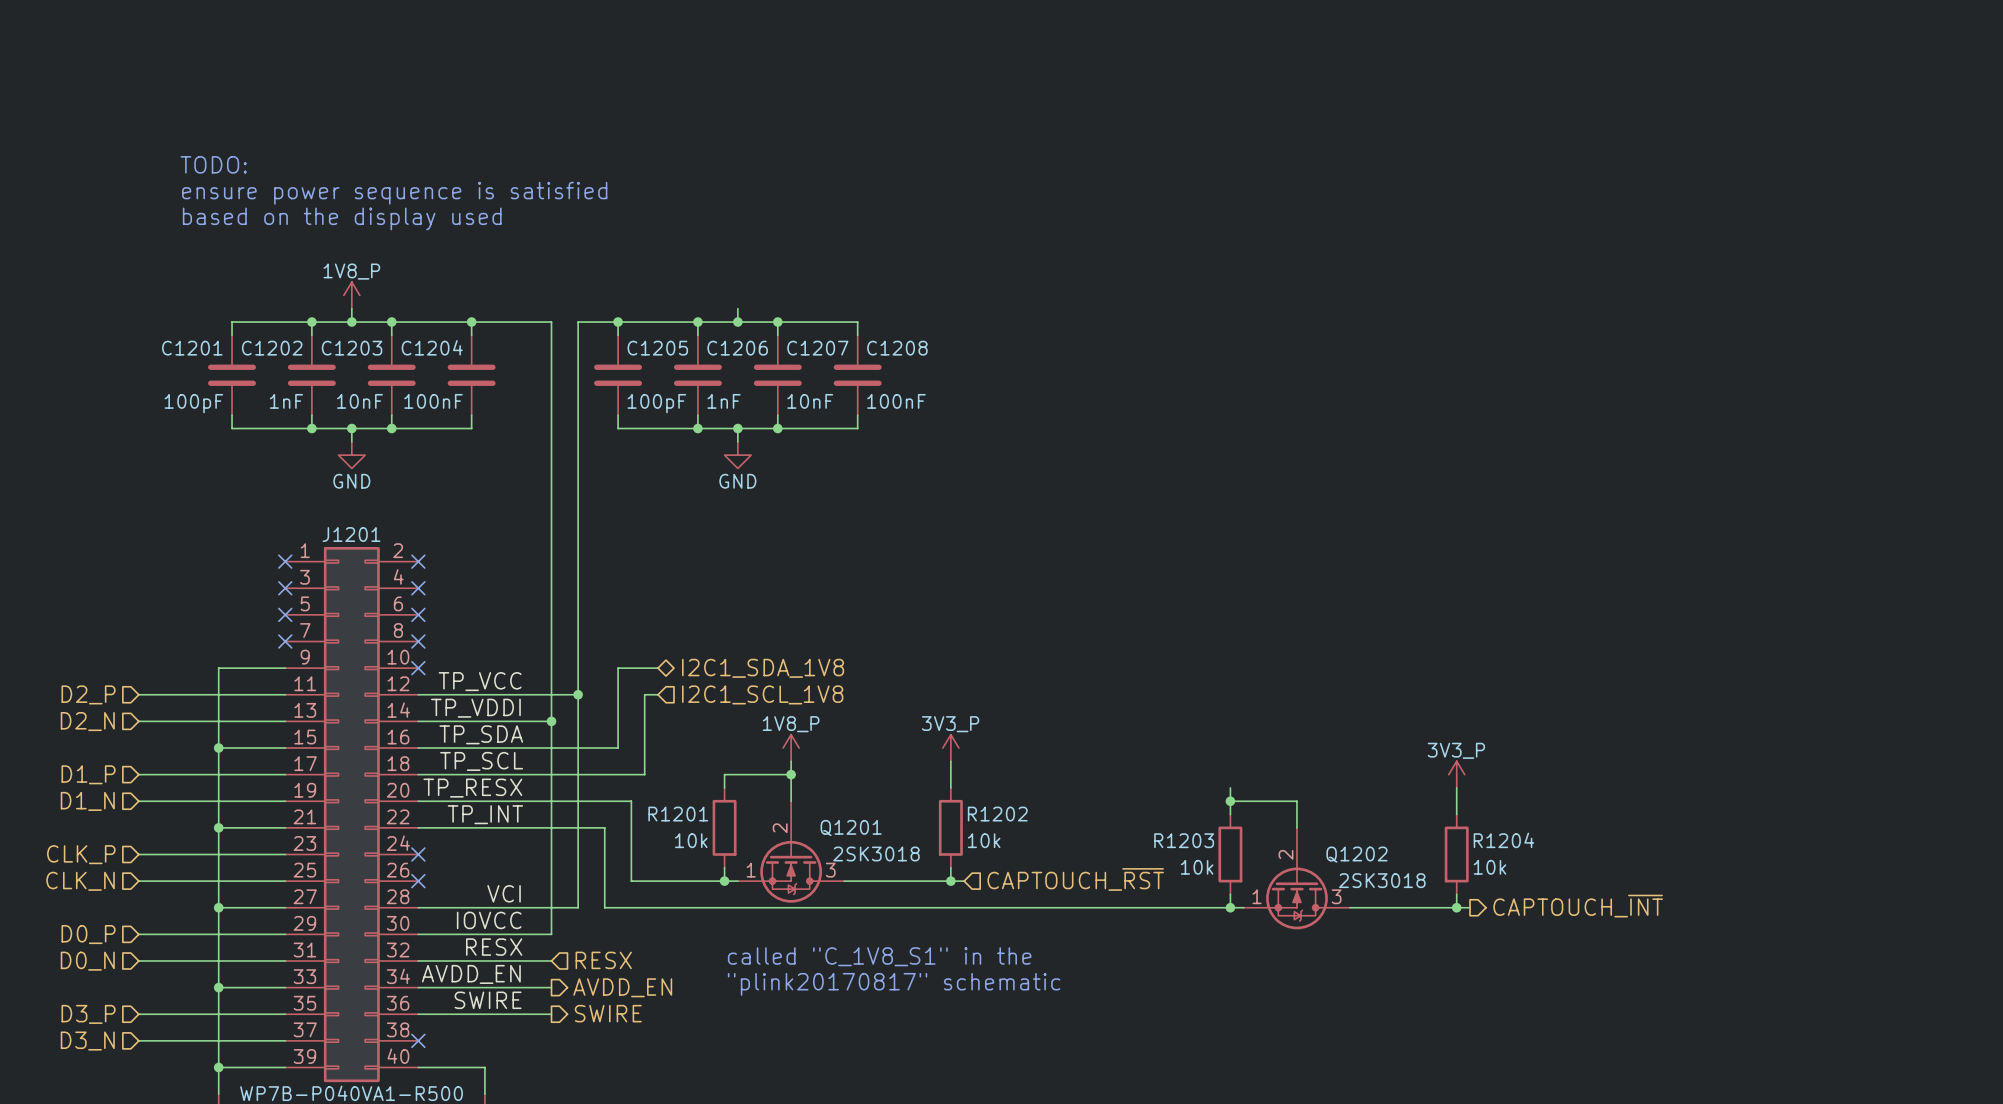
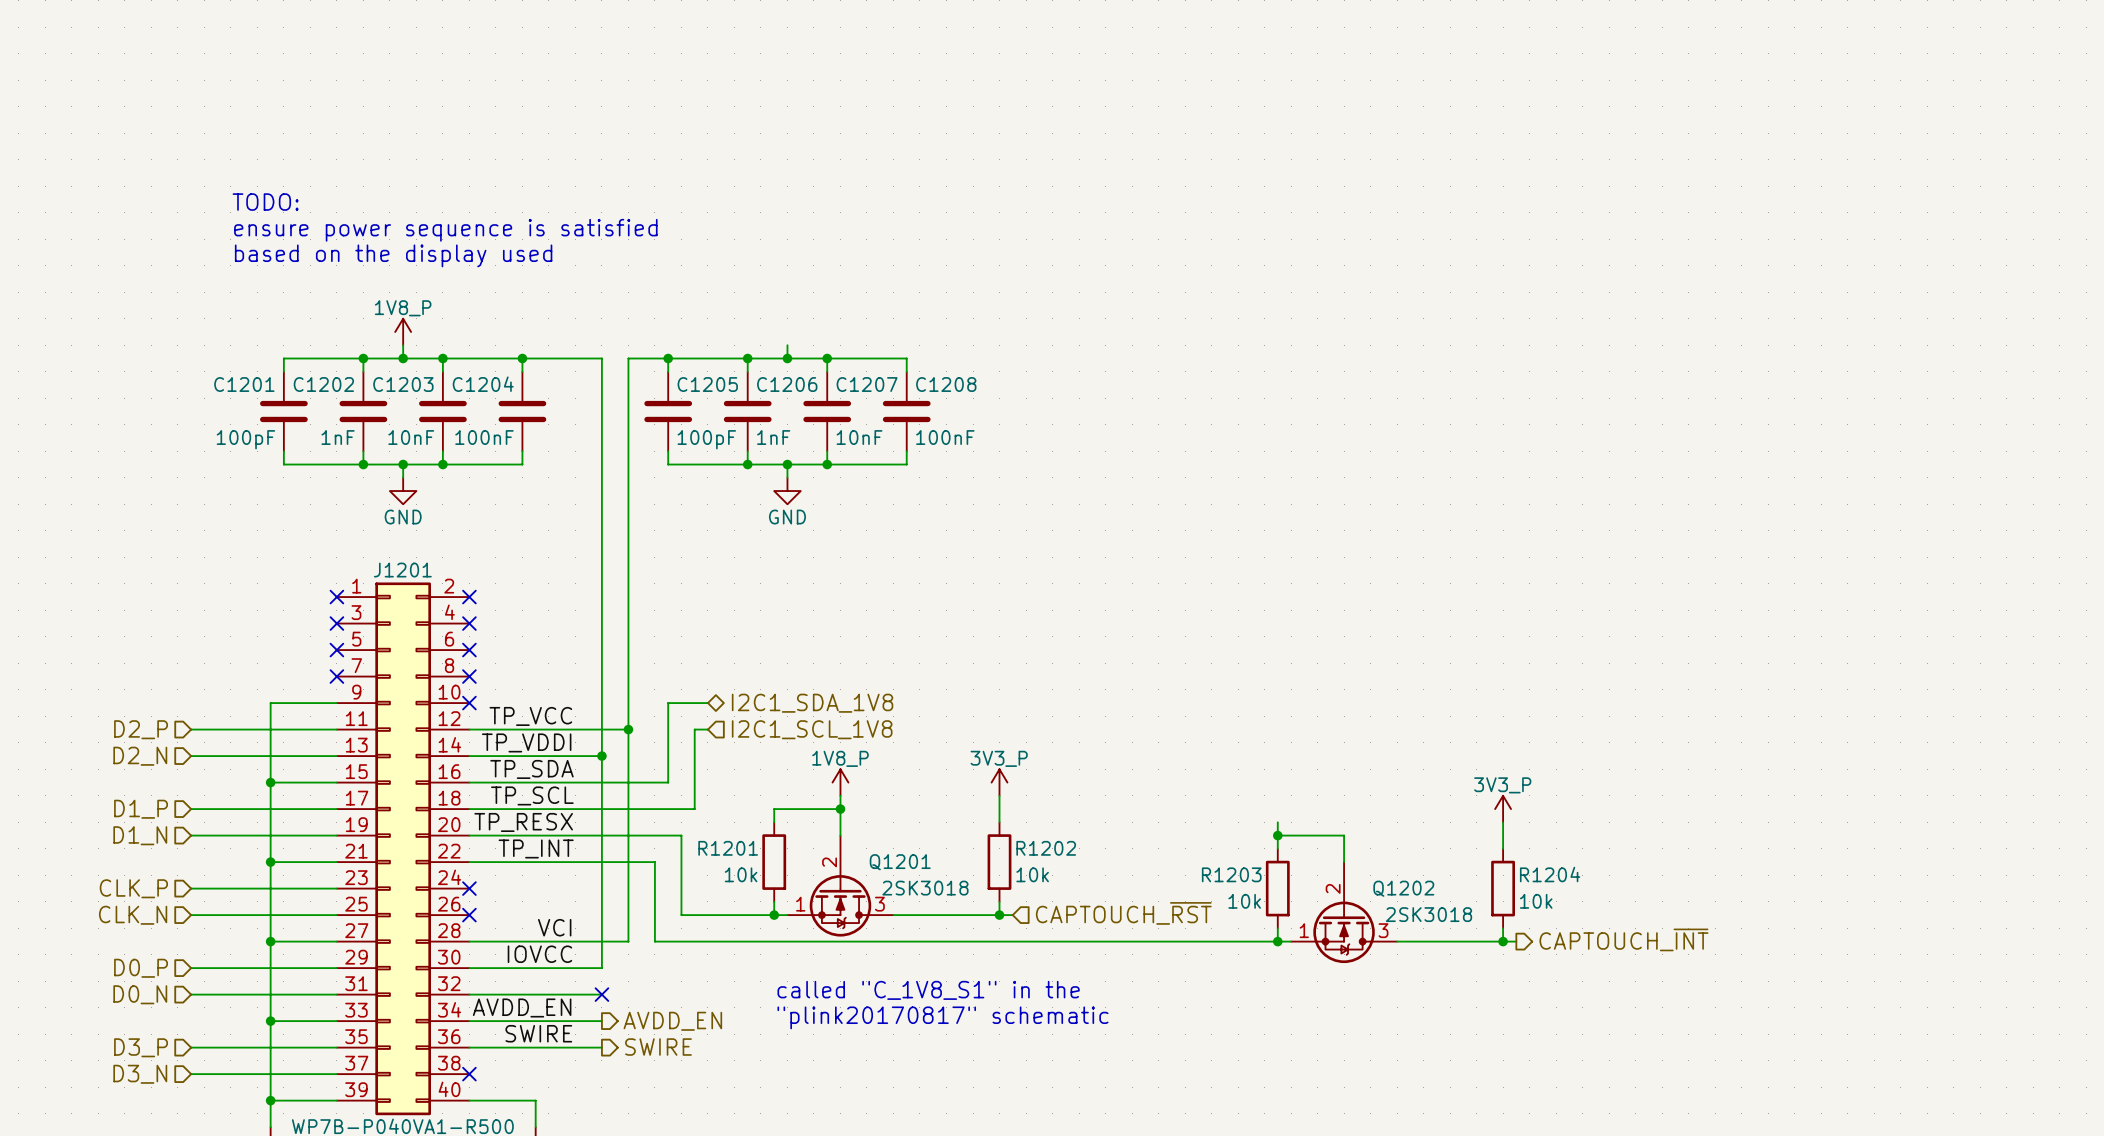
label: RESX (494, 947) -> none
no-connect mark: none -> (601, 994)
hierarchical label: RESX (603, 960) -> none

